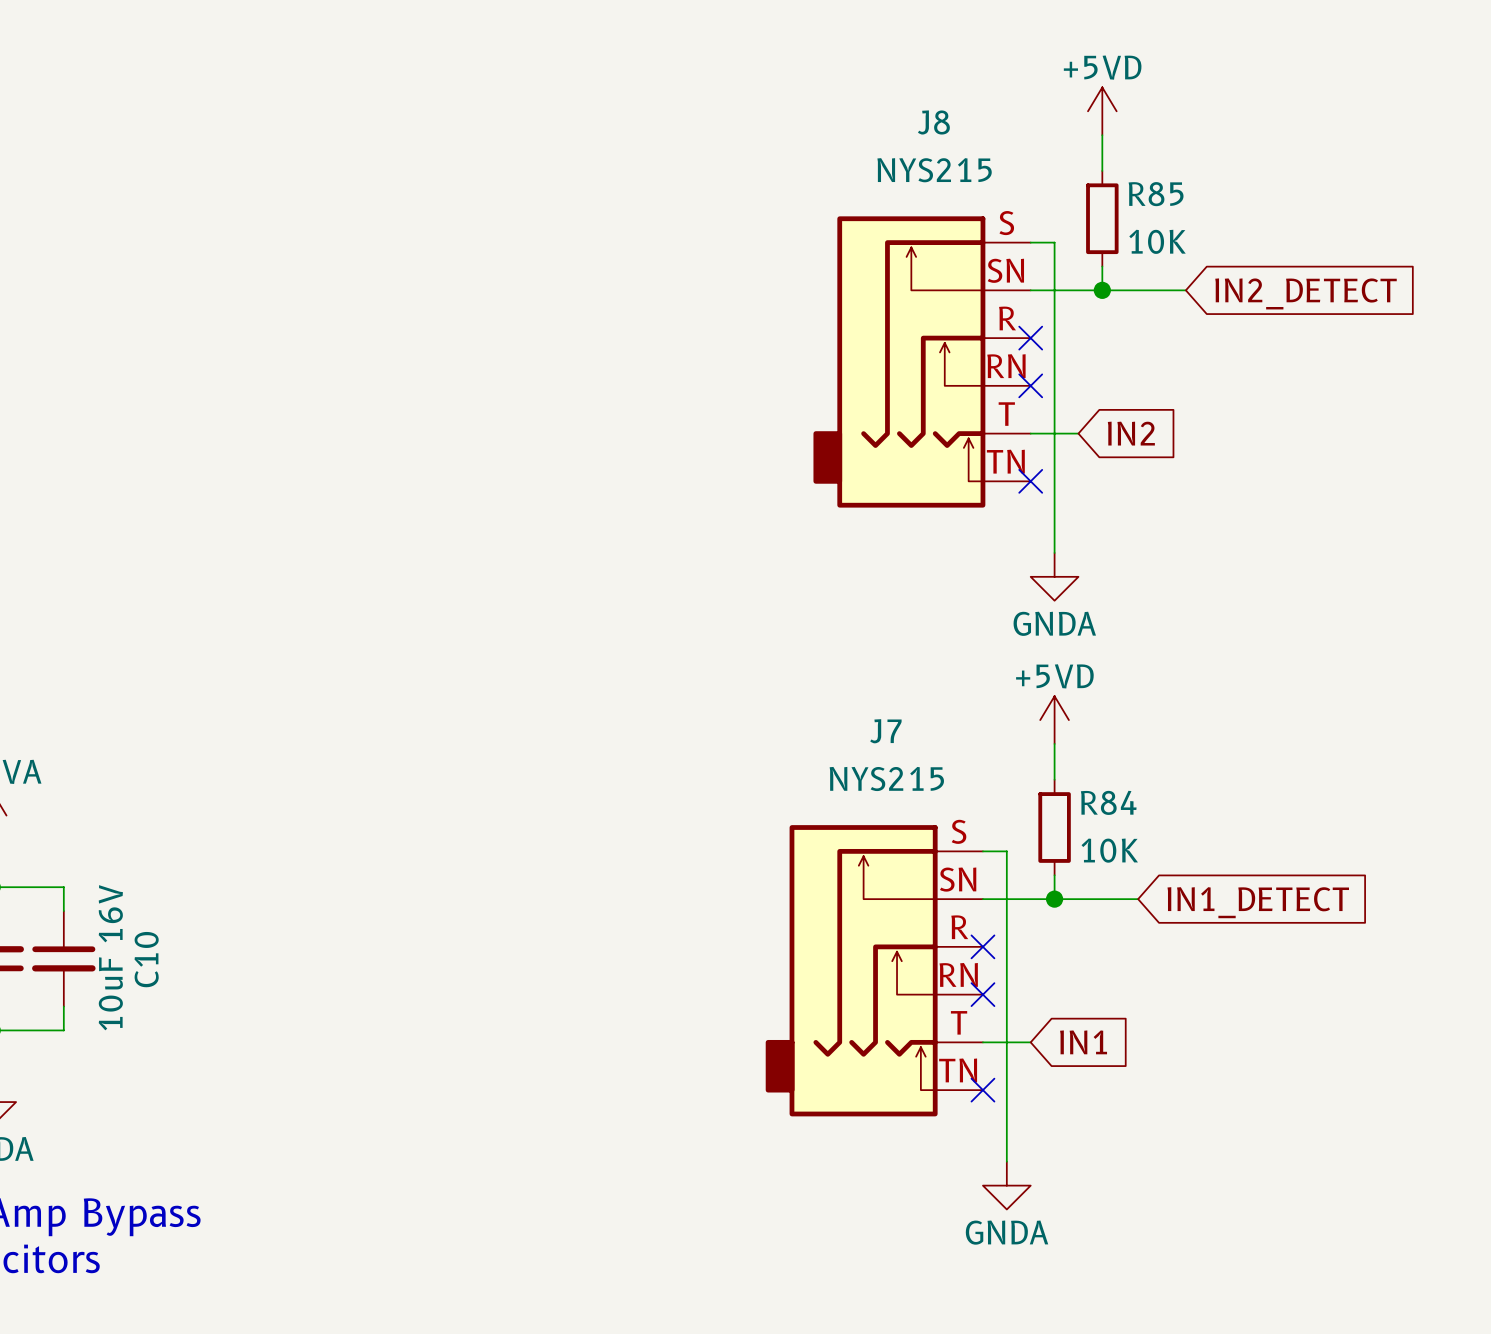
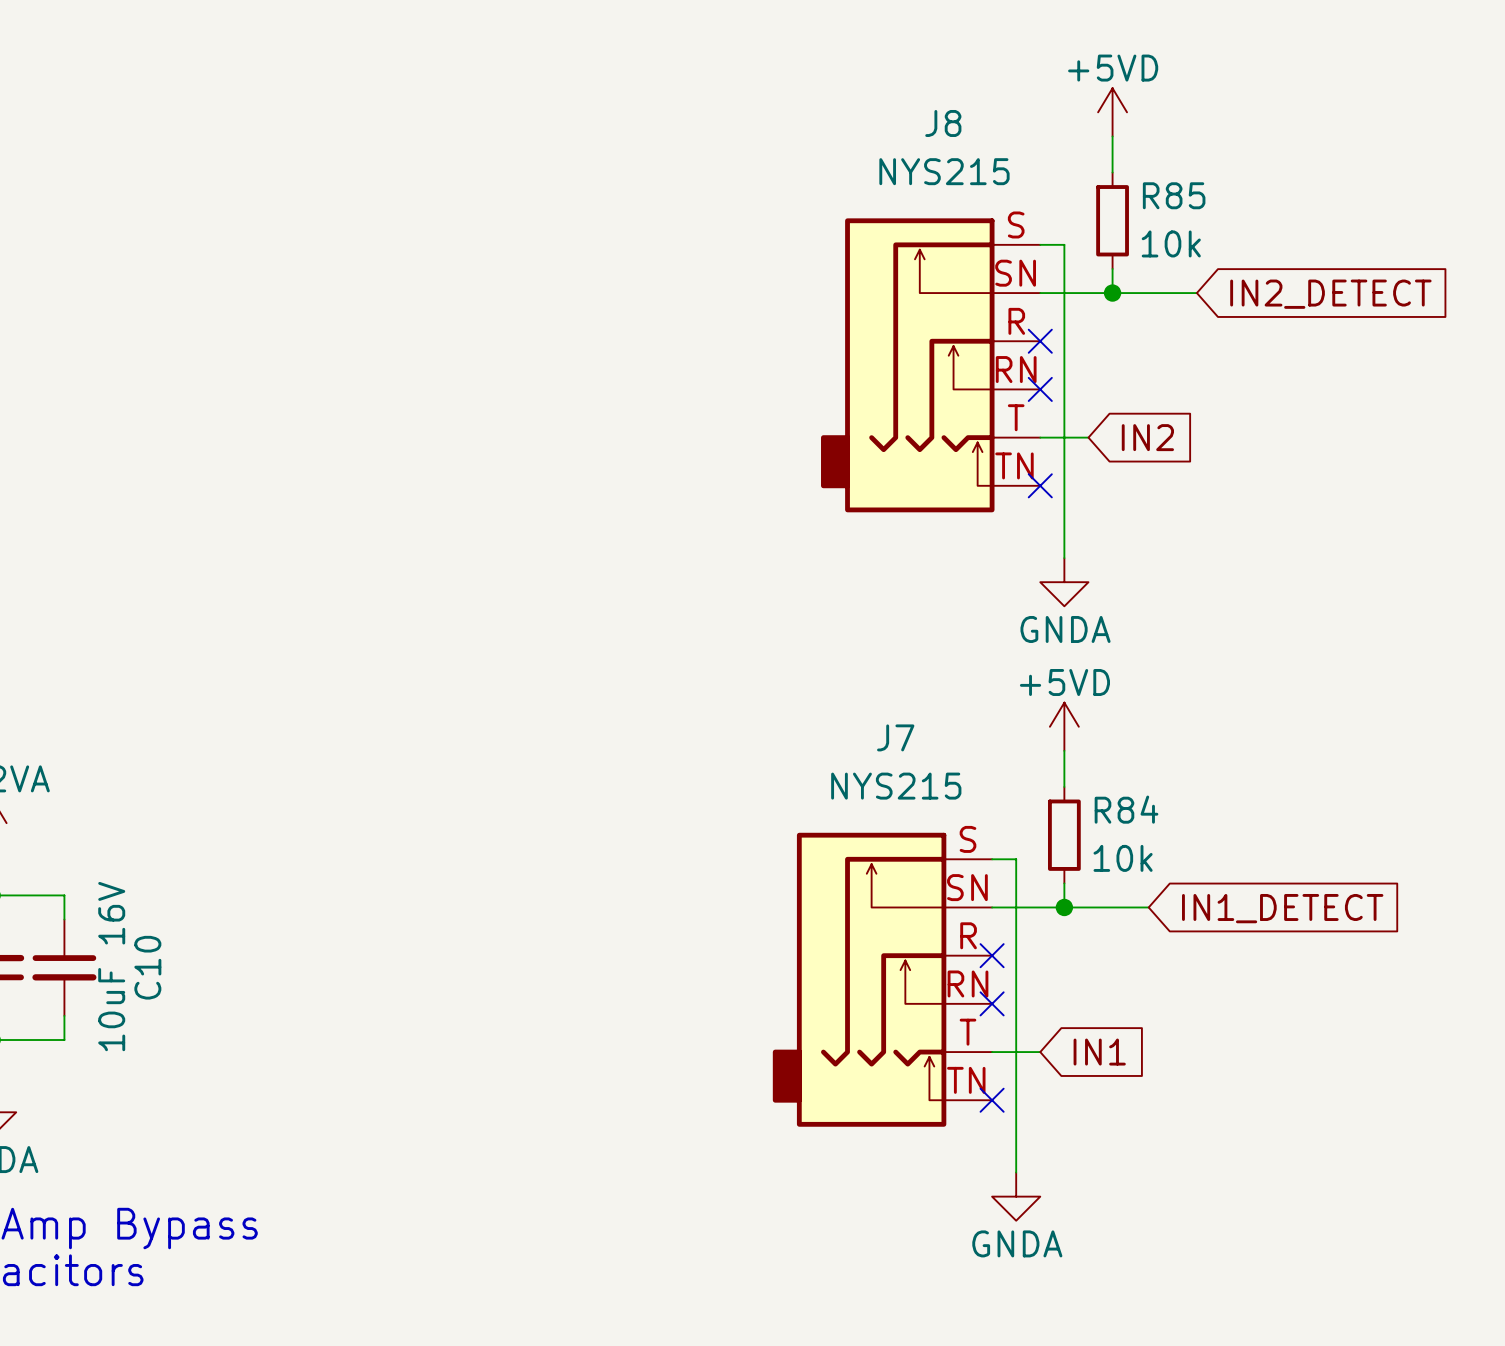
R85 value: 10K (1157, 241) -> 10k (1171, 243)
R84 value: 10K (1109, 850) -> 10k (1123, 858)

